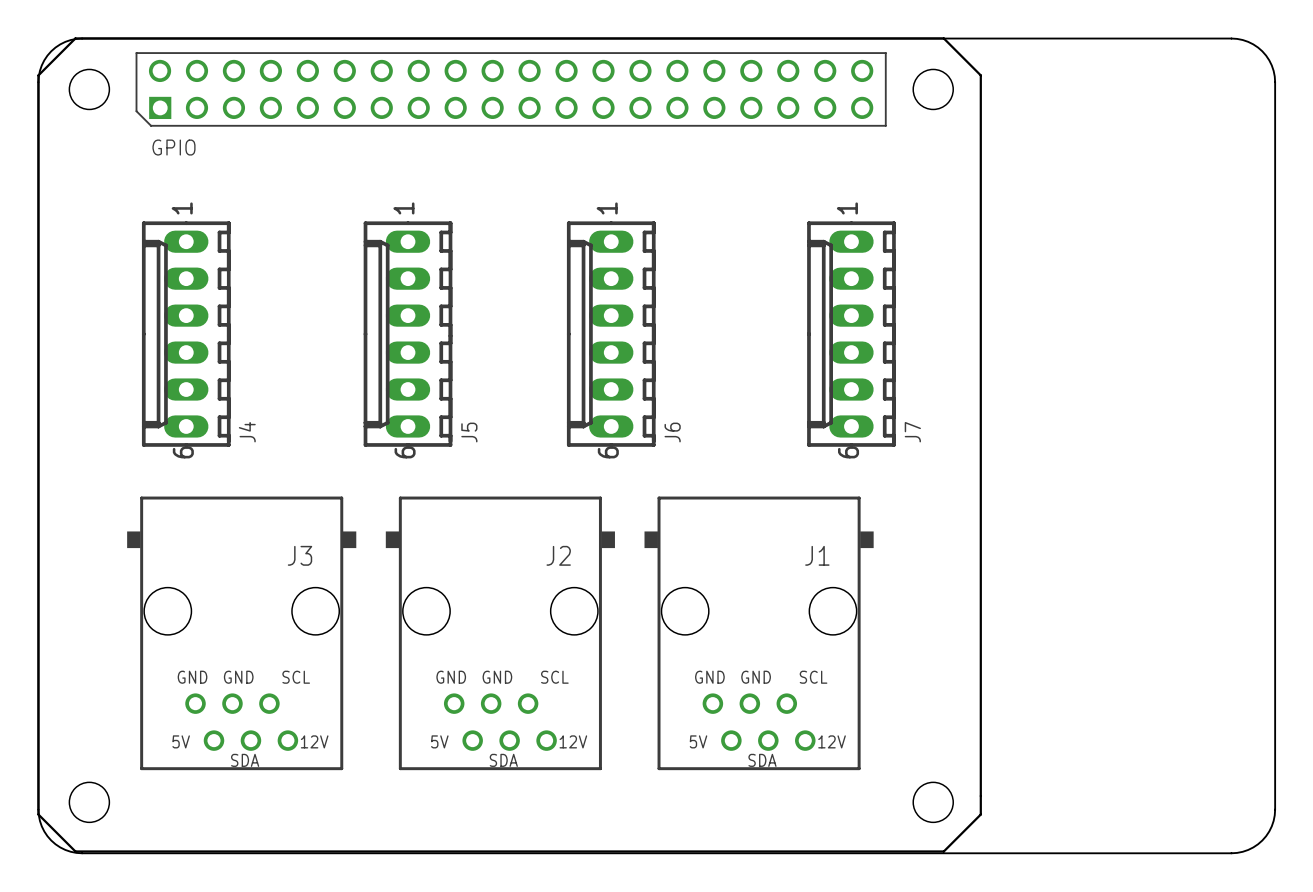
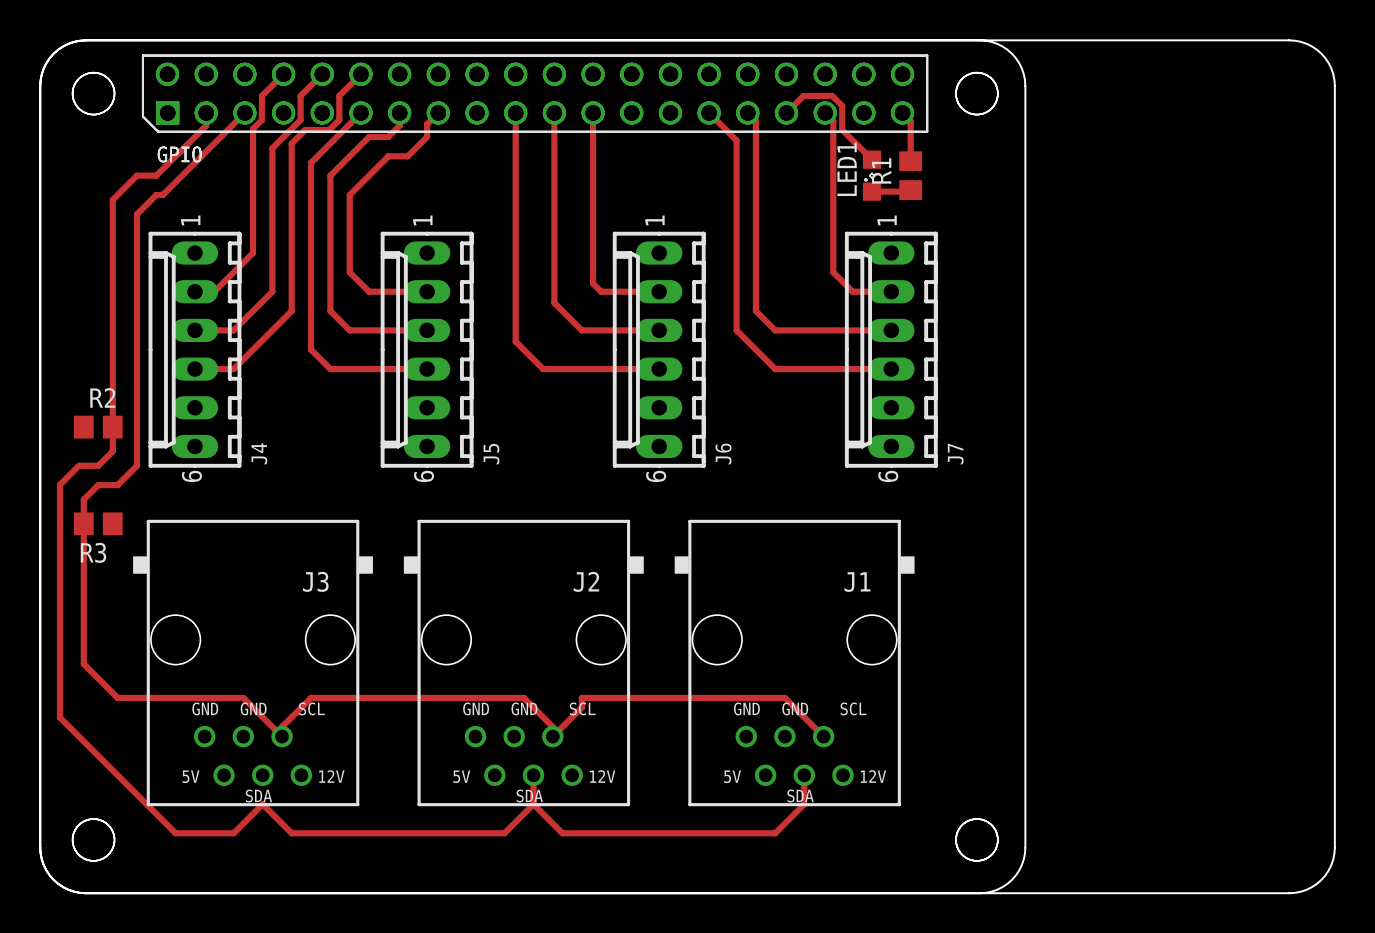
board edge: (75, 38) (38, 75) (38, 814) (75, 851) (943, 851) (980, 814) (980, 75) (943, 38) (75, 38) -> none
track: none -> (283, 74) (261, 95) (261, 120) (253, 128) (253, 253) (214, 291) (195, 291)
track: none -> (322, 74) (300, 95) (300, 120) (272, 148) (272, 291) (233, 330) (195, 330)
track: none -> (360, 74) (339, 95) (339, 120) (329, 129) (305, 129) (291, 143) (291, 311) (233, 369) (195, 369)
track: none -> (206, 112) (206, 125) (156, 175) (136, 175) (112, 199) (112, 451) (98, 465) (78, 465) (59, 484) (59, 717) (175, 833) (233, 833) (262, 804) (291, 833) (504, 833) (533, 804)
track: none -> (244, 112) (162, 195) (156, 195) (136, 214) (136, 465) (117, 485) (98, 485) (83, 499) (83, 664) (117, 697) (243, 697) (282, 736) (282, 726) (311, 697) (523, 697) (552, 726) (552, 736) (581, 707) (581, 697) (784, 697) (823, 736)
track: none -> (360, 112) (311, 162) (311, 349) (330, 369) (427, 369)
track: none -> (399, 112) (399, 125) (388, 136) (369, 136) (330, 175) (330, 311) (349, 330) (427, 330)
track: none -> (438, 112) (427, 124) (427, 136) (407, 156) (388, 156) (349, 195) (349, 272) (369, 291) (427, 291)
track: none -> (515, 112) (515, 341) (543, 369) (659, 369)
track: none -> (554, 112) (554, 302) (581, 330) (659, 330)
track: none -> (593, 112) (593, 283) (601, 291) (659, 291)
track: none -> (709, 112) (736, 140) (736, 330) (775, 369) (891, 369)
track: none -> (747, 112) (755, 121) (755, 311) (775, 330) (891, 330)
track: none -> (786, 112) (803, 95) (832, 95) (842, 105) (842, 129) (871, 159)
track: none -> (825, 112) (833, 121) (833, 272) (852, 291) (891, 291)
track: none -> (902, 112) (910, 121) (910, 161)
LED1: none -> (871, 175)
R1: none -> (910, 175)
track: none -> (910, 190) (871, 191)
J6 position: (611, 334) -> (659, 349)
R2: none -> (98, 427)
part: none -> (532, 466)
R3: none -> (98, 523)
track: none -> (533, 775) (533, 804)
track: none -> (804, 775) (804, 804) (775, 833) (562, 833) (533, 804)

